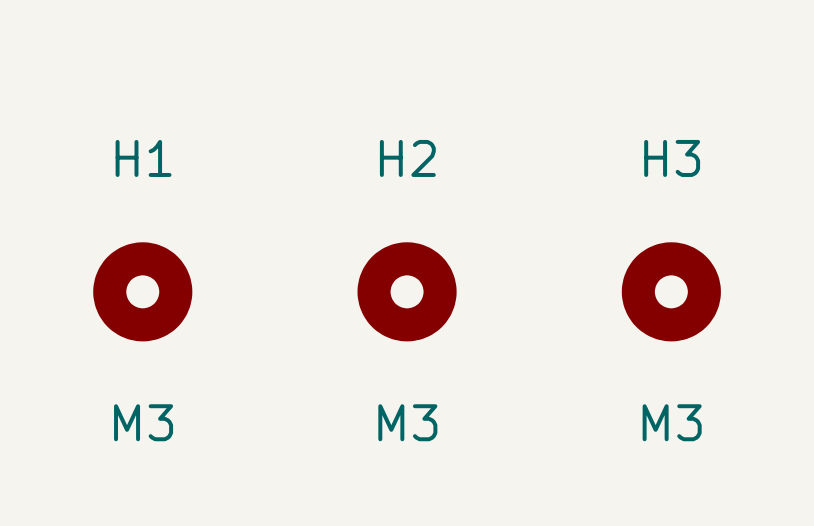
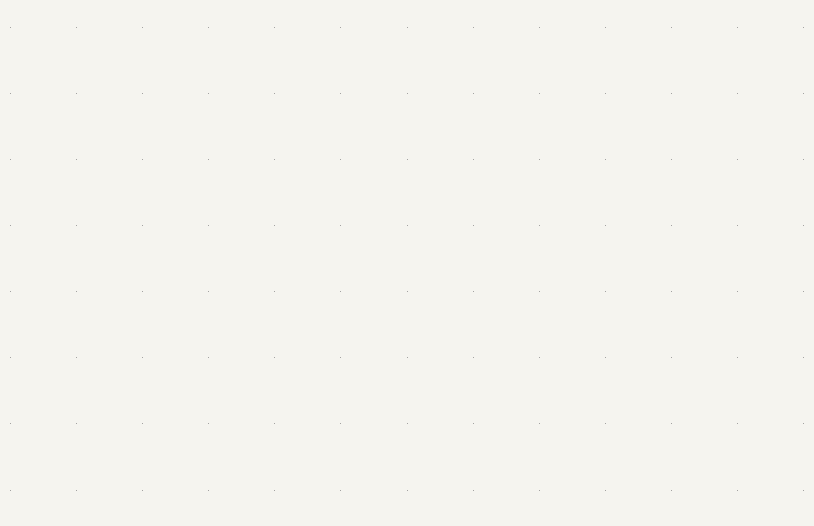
H1: M3 (142, 291) -> none
H2: M3 (407, 291) -> none
H3: M3 (671, 291) -> none

